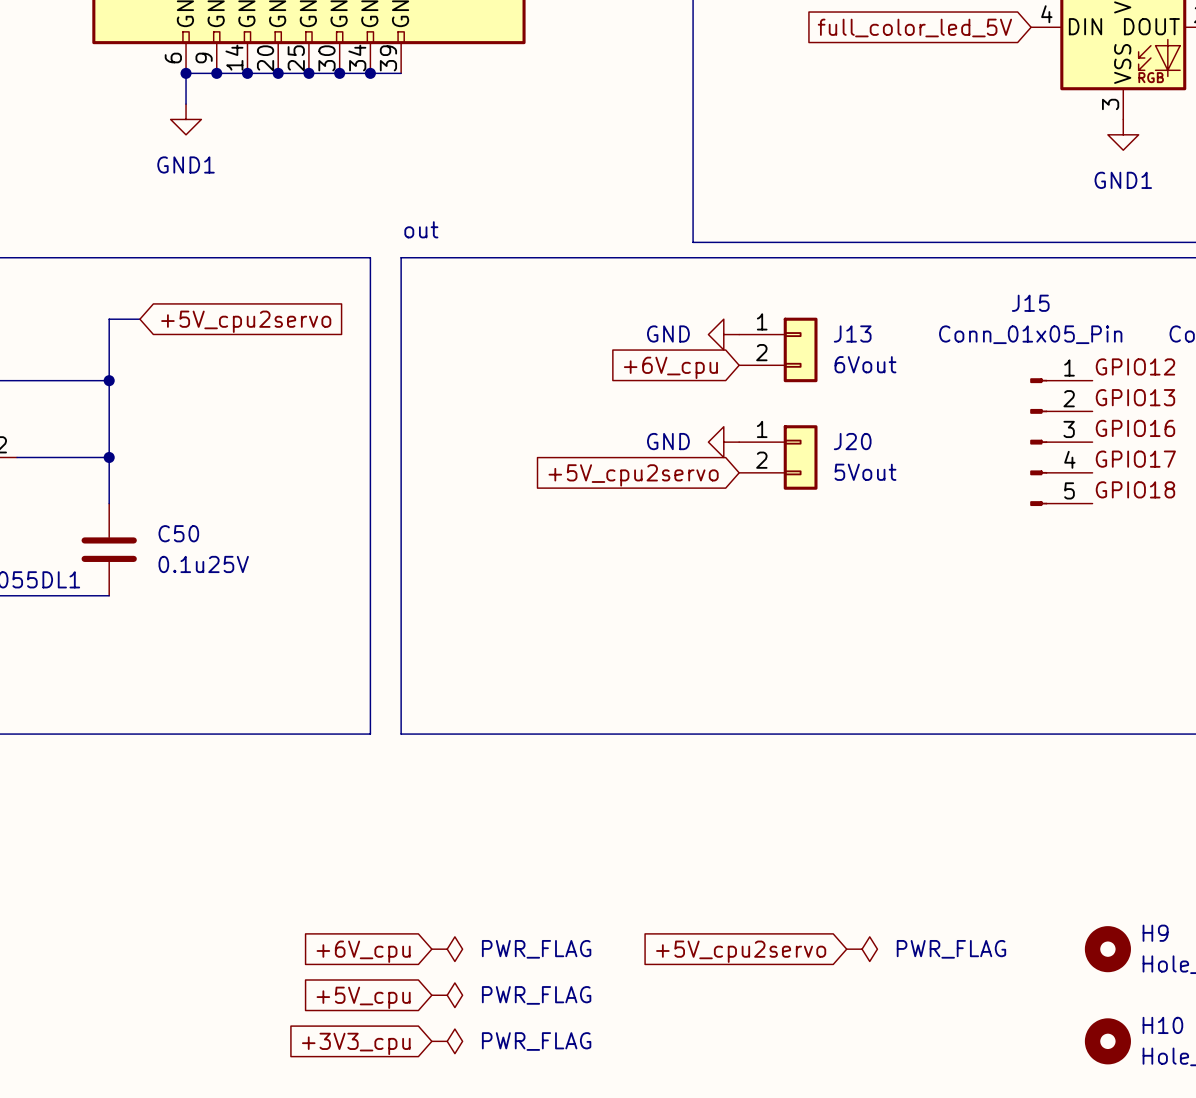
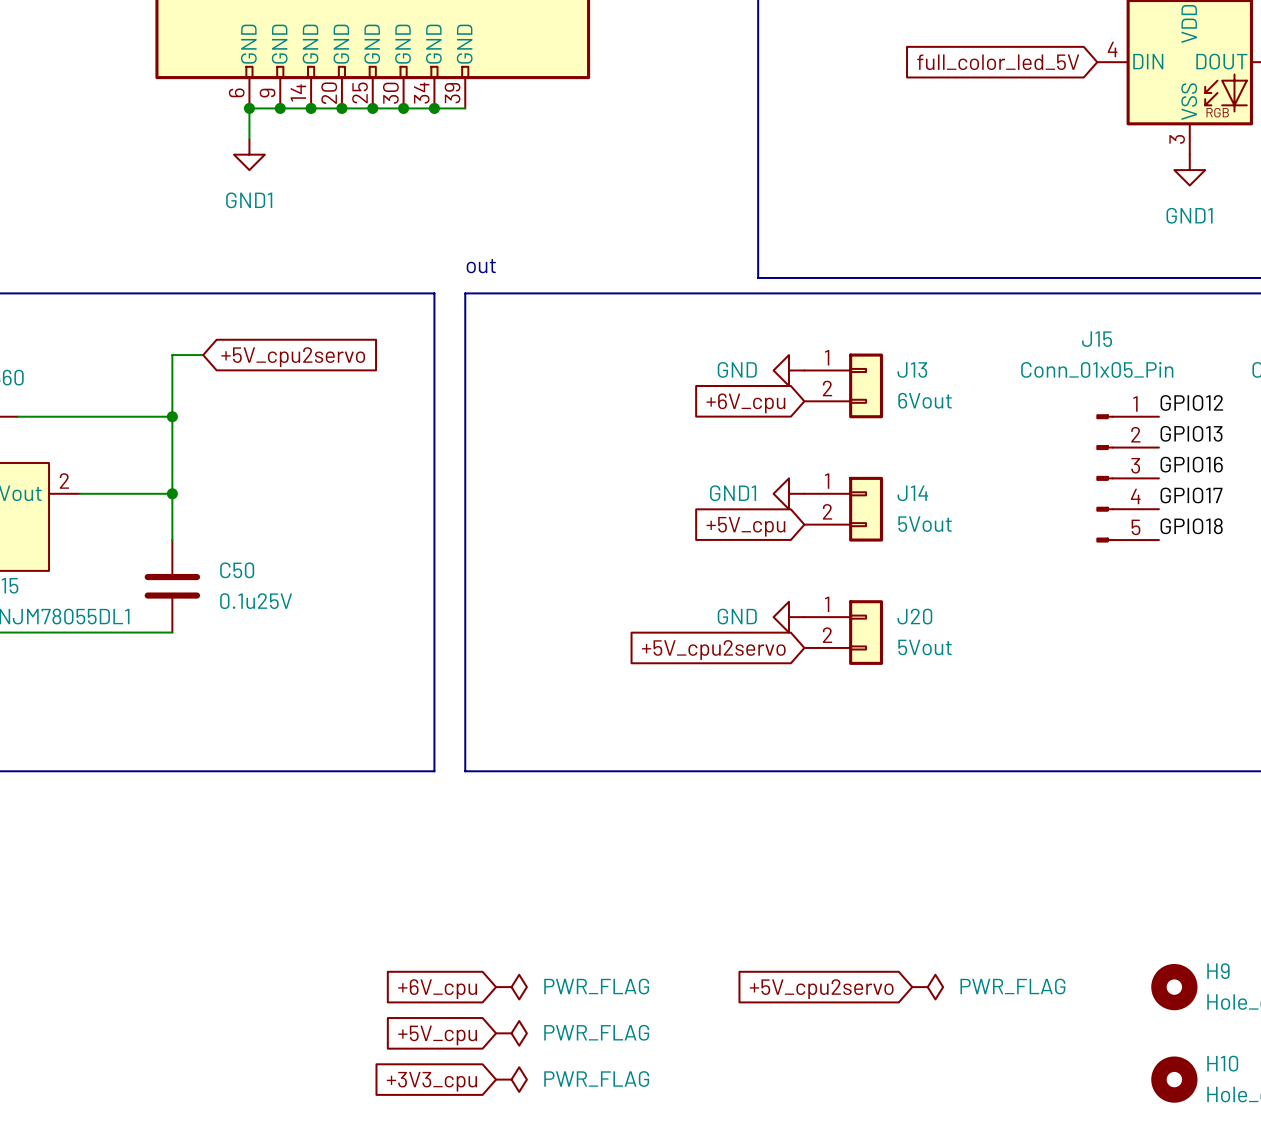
power symbol position: GND (723, 442) -> GND (788, 617)
power symbol: none -> GND1 (788, 493)
J20 position: (778, 457) -> (843, 632)
J14: none -> 5Vout (843, 509)
global label position: +5V_cpu2servo (633, 475) -> +5V_cpu2servo (713, 650)
global label: none -> +5V_cpu (745, 526)

